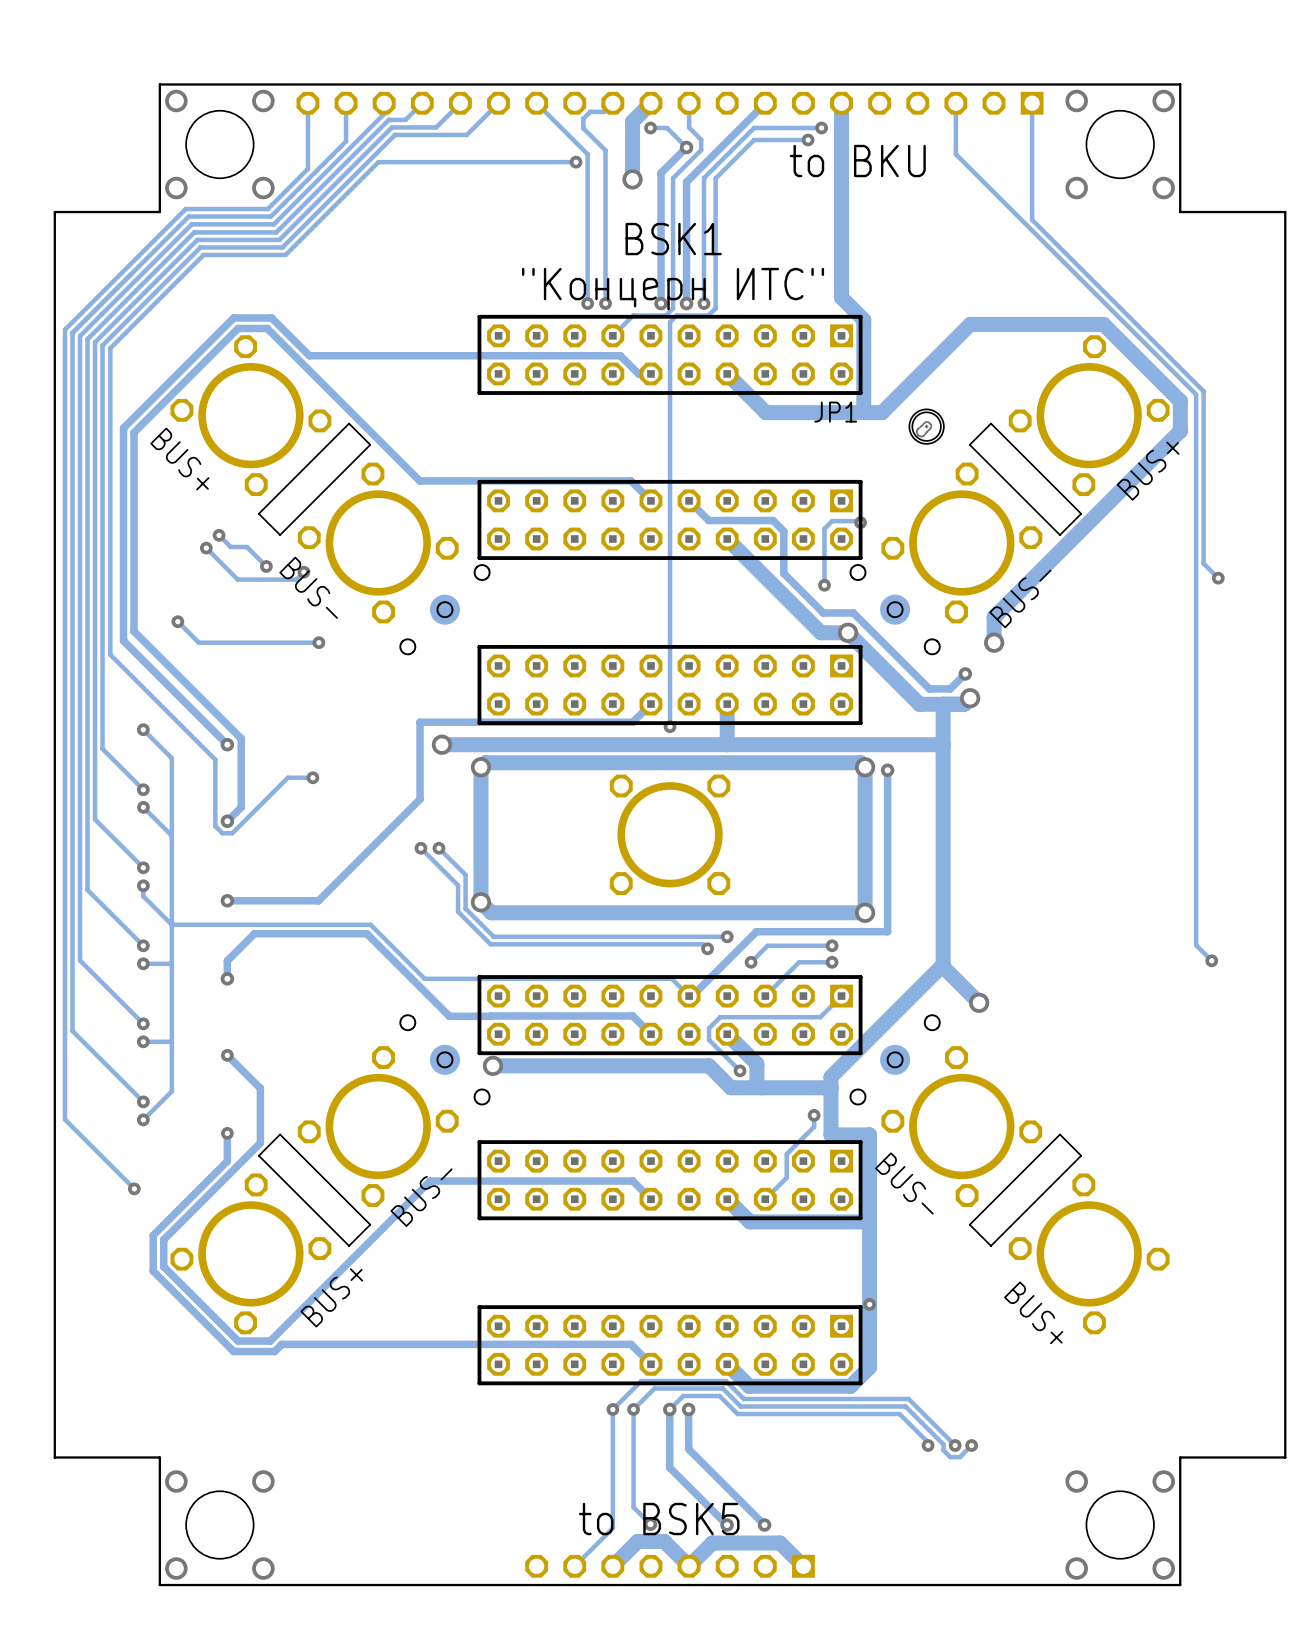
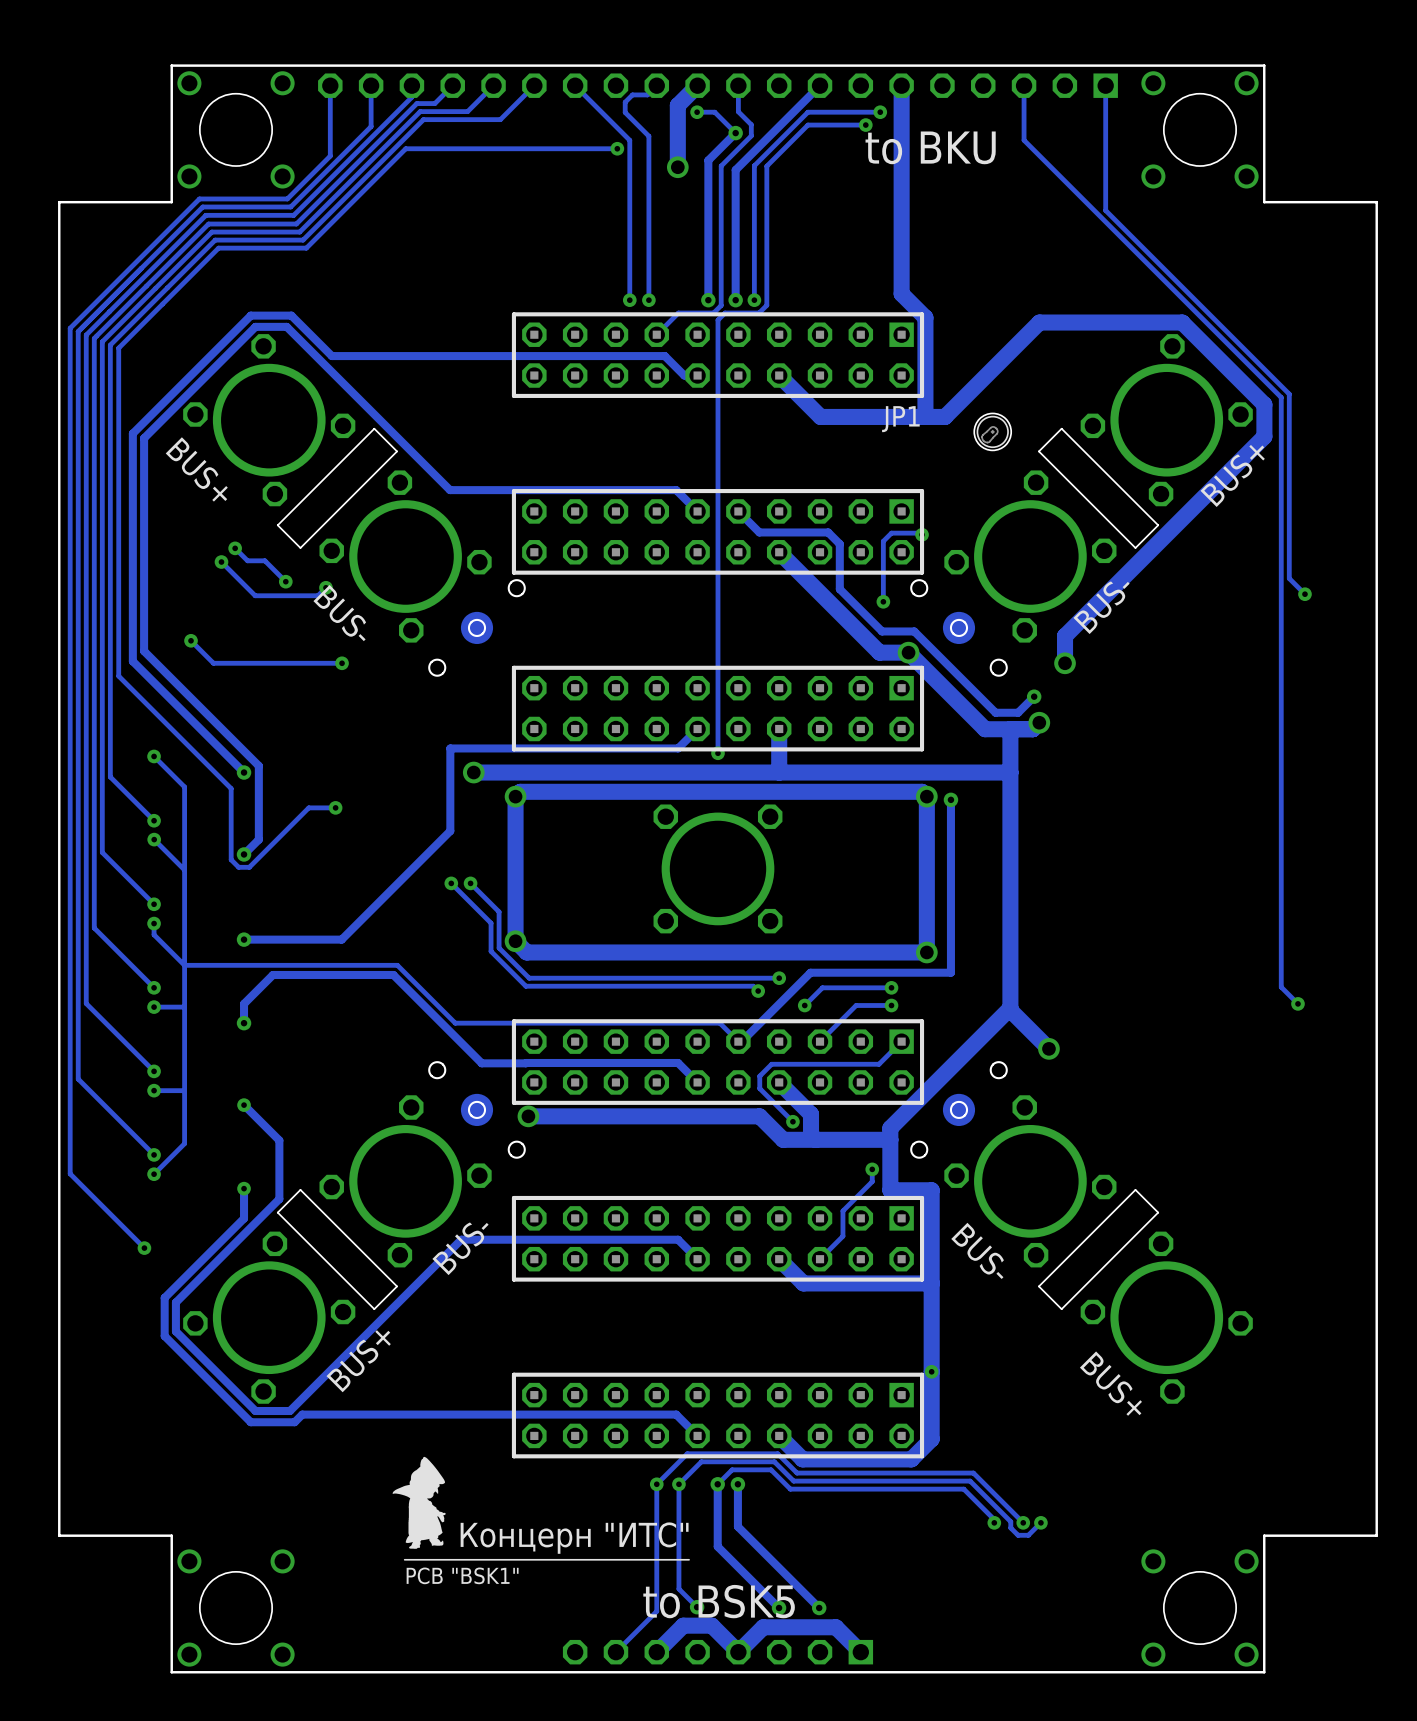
text: BSK1 (673, 239) -> none
text: "Концерн ИТС" (673, 289) -> none
drawing: none -> [392, 1456, 690, 1561]

